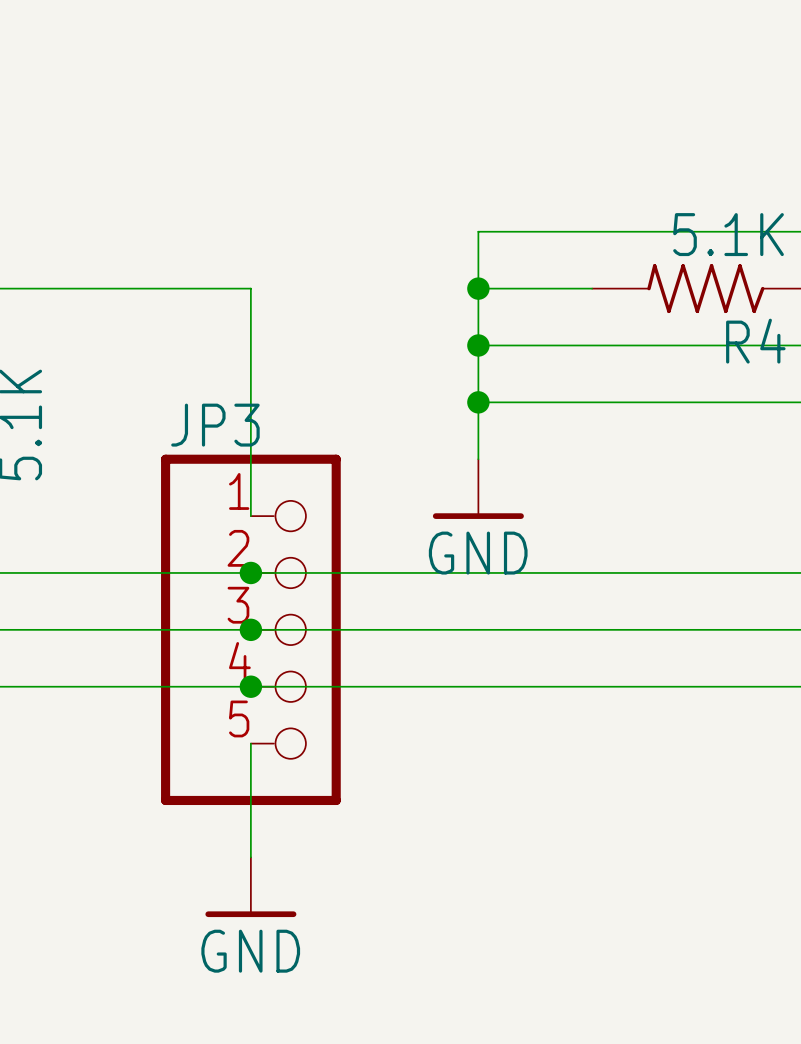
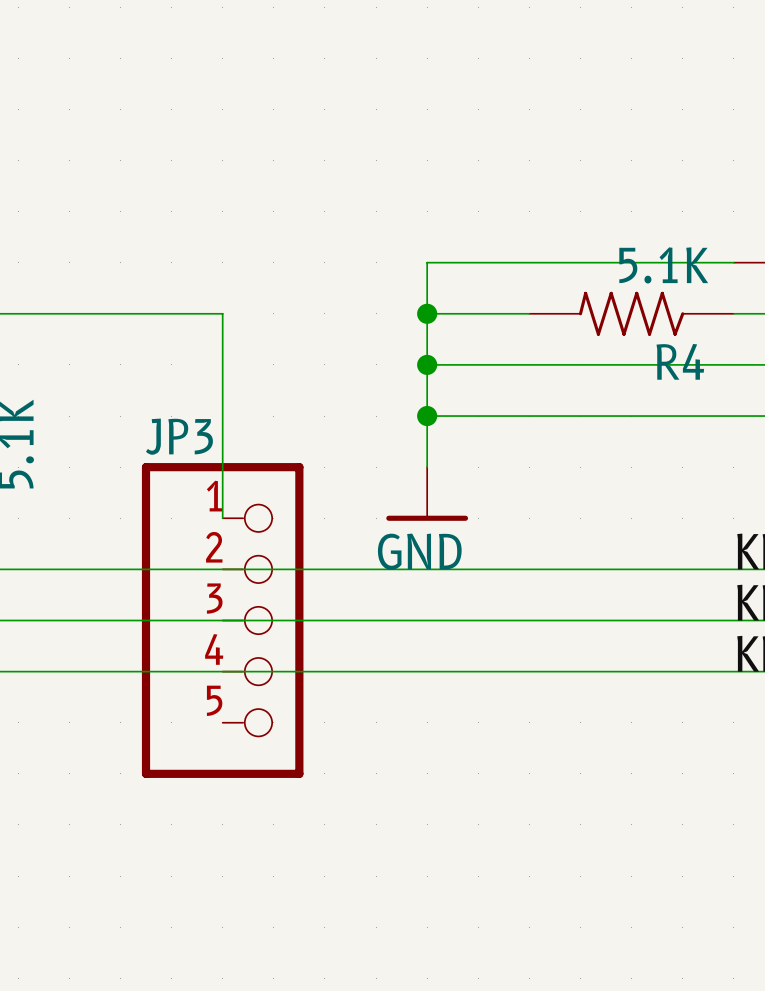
junction: (250, 572) -> none
junction: (250, 629) -> none
junction: (250, 686) -> none
wire: (250, 743) (250, 857) -> none
power symbol: GND (250, 887) -> none

